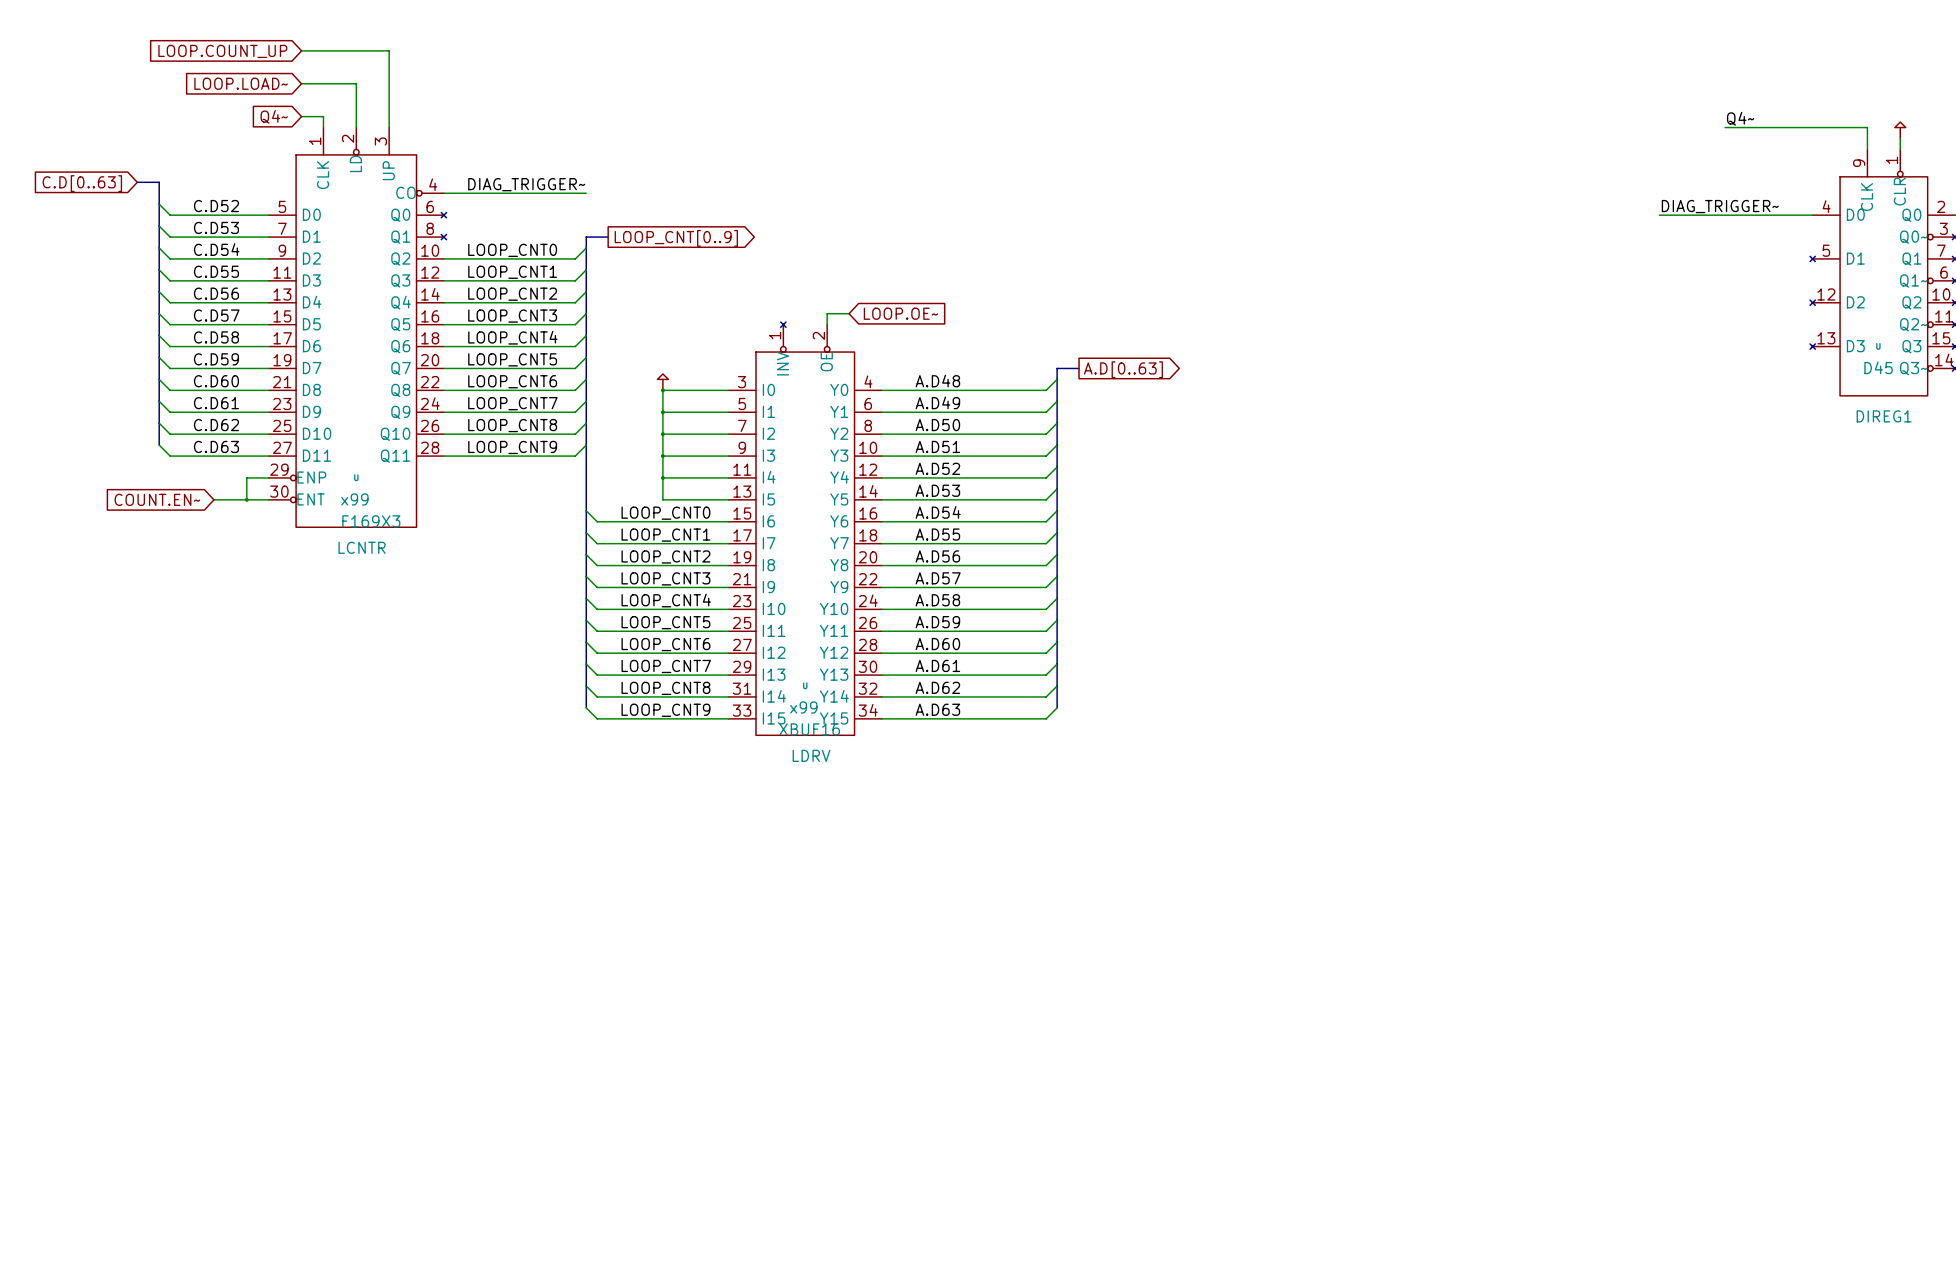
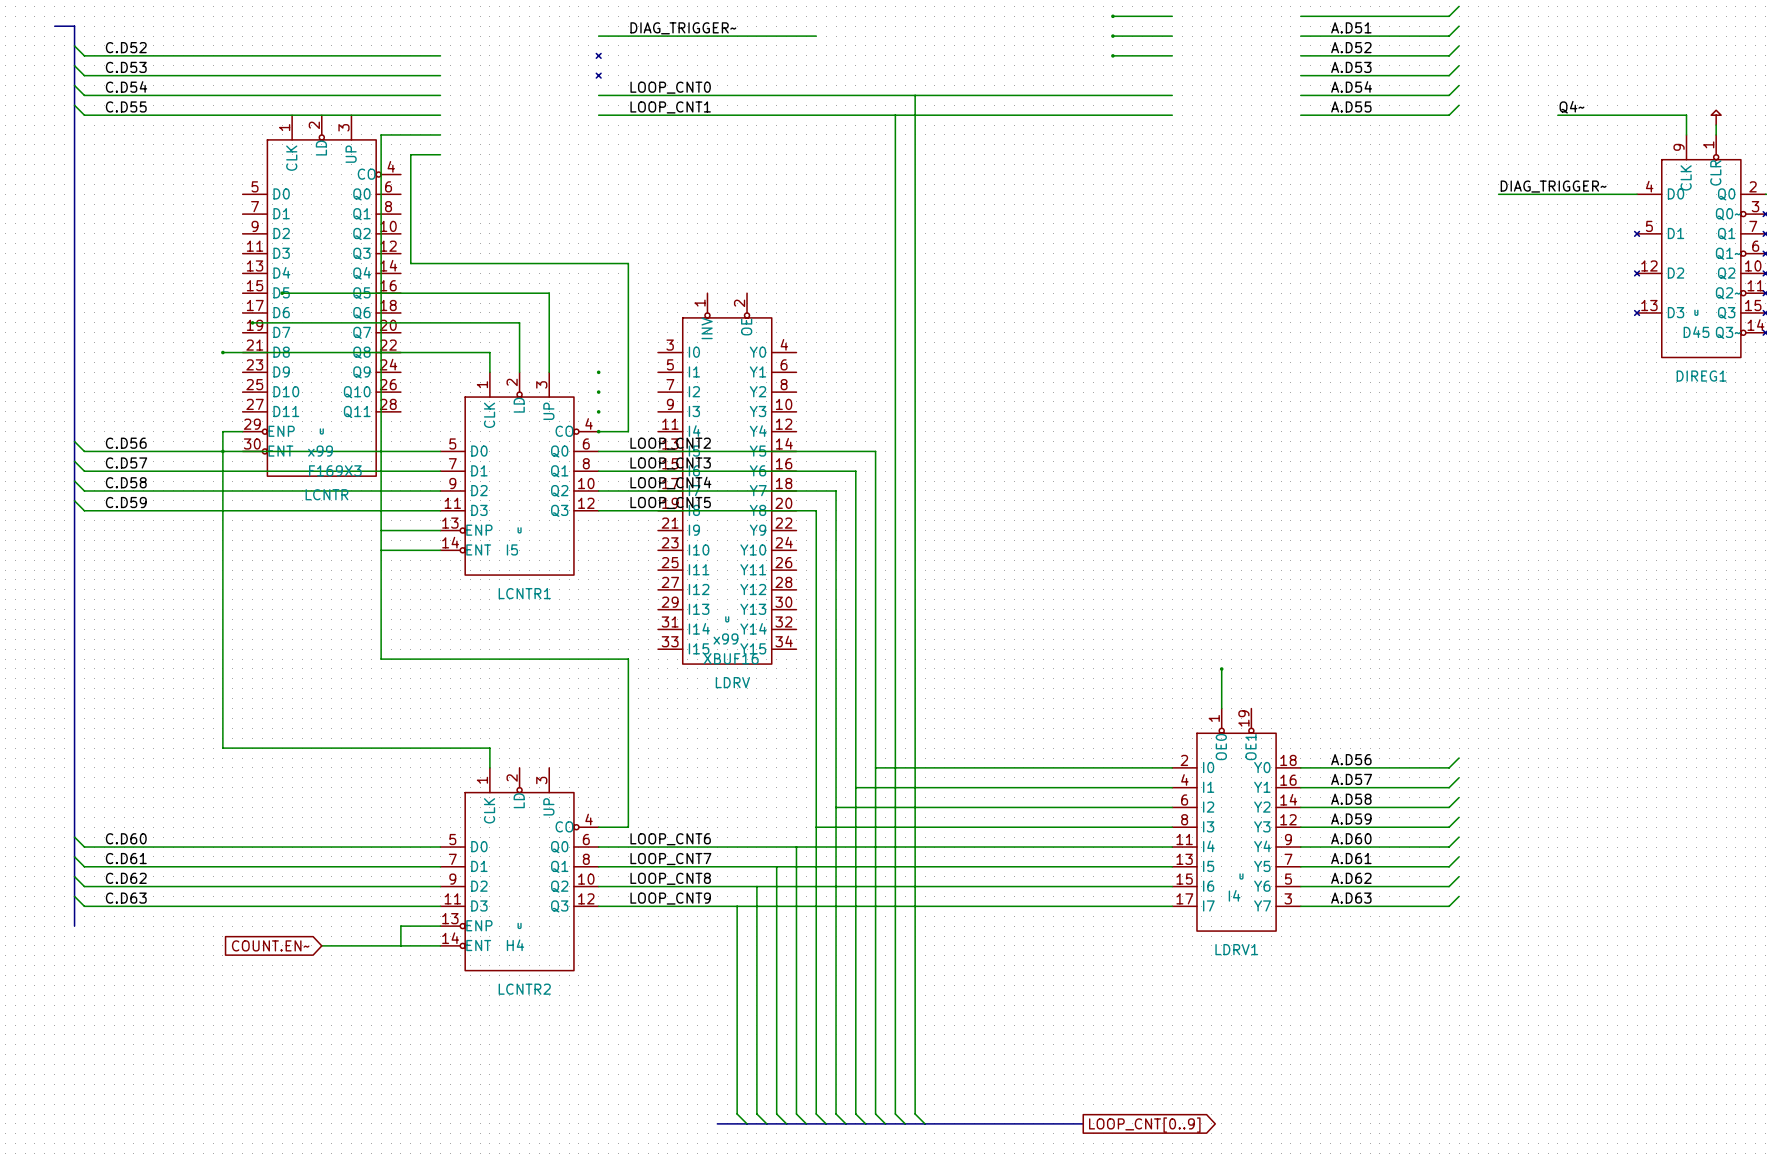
wire: none -> (1459, 6) (1449, 16) (1300, 16)
wire: none -> (1112, 16) (1172, 16)
junction: none -> (1112, 16)
bus: none -> (54, 26) (74, 26) (74, 926)
wire: none -> (1459, 26) (1449, 36) (1300, 36)
label: none -> A.D51 (1351, 27)
label: none -> DIAG_TRIGGER~ (683, 28)
wire: none -> (598, 36) (816, 36)
wire: none -> (1112, 36) (1172, 36)
junction: none -> (1112, 36)
wire: none -> (74, 45) (84, 55) (440, 55)
wire: (301, 50) (389, 50) (389, 127) -> none
wire: none -> (1459, 45) (1449, 55) (1300, 55)
global label: LOOP.COUNT_UP (222, 51) -> none
label: none -> C.D52 (126, 47)
label: none -> A.D52 (1351, 47)
no-connect mark: none -> (598, 55)
wire: none -> (1112, 55) (1172, 55)
junction: none -> (1112, 55)
wire: none -> (74, 65) (84, 75) (272, 75)
wire: none -> (1459, 65) (1449, 75) (1300, 75)
label: none -> C.D53 (126, 67)
label: none -> A.D53 (1351, 67)
global label: LOOP.LOAD~ (241, 83) -> none
wire: (356, 83) (356, 127) -> (321, 75) (440, 75)
no-connect mark: none -> (598, 75)
wire: none -> (74, 85) (84, 95) (440, 95)
wire: none -> (1459, 85) (1449, 95) (1300, 95)
label: none -> C.D54 (126, 86)
label: none -> A.D54 (1351, 86)
label: none -> LOOP_CNT0 (670, 87)
wire: none -> (598, 95) (1172, 95)
wire: none -> (915, 95) (915, 1114) (925, 1123)
wire: none -> (74, 105) (84, 115) (440, 115)
global label: Q4~ (274, 116) -> none
wire: (301, 116) (323, 116) (323, 127) -> none
wire: none -> (1459, 105) (1449, 115) (1300, 115)
label: none -> C.D55 (126, 106)
label: none -> LOOP_CNT1 (670, 107)
label: none -> A.D55 (1351, 106)
wire: none -> (598, 115) (1172, 115)
wire: none -> (895, 115) (895, 1114) (905, 1123)
wire: none -> (440, 134) (381, 134) (381, 659) (628, 659) (628, 827) (598, 827)
bus: (137, 182) (159, 182) (159, 445) -> none
global label: C.D[0..63] (82, 183) -> none
label: DIAG_TRIGGER~ (526, 184) -> none
wire: (443, 193) (586, 193) -> none
wire: (159, 204) (170, 215) (268, 215) -> none
label: C.D52 (216, 206) -> none
no-connect mark: (443, 215) -> none
wire: (159, 226) (170, 237) (268, 237) -> none
label: C.D53 (216, 227) -> none
no-connect mark: (443, 237) -> none
bus: (608, 237) (586, 237) (586, 707) -> none
global label: LOOP_CNT[0..9] (676, 238) -> none
wire: (159, 248) (170, 258) (268, 258) -> none
wire: (586, 248) (575, 258) (443, 258) -> none
label: C.D54 (216, 249) -> none
label: LOOP_CNT0 (512, 250) -> none
wire: (159, 269) (170, 280) (268, 280) -> none
wire: (586, 269) (575, 280) (443, 280) -> none
label: C.D55 (216, 271) -> none
label: LOOP_CNT1 (512, 272) -> none
wire: (159, 291) (170, 302) (268, 302) -> none
wire: (586, 291) (575, 302) (443, 302) -> none
label: C.D56 (216, 293) -> none
label: LOOP_CNT2 (512, 294) -> none
wire: (159, 313) (170, 324) (268, 324) -> none
wire: (586, 313) (575, 324) -> (549, 372) (549, 293) (519, 293)
wire: (849, 313) (827, 313) (827, 324) -> none
global label: LOOP.OE~ (900, 313) -> none
label: C.D57 (216, 315) -> none
label: LOOP_CNT3 (512, 316) -> none
wire: none -> (282, 293) (400, 293)
junction: none -> (282, 293)
no-connect mark: (783, 324) -> none
wire: (159, 335) (170, 346) (268, 346) -> none
wire: (586, 335) (575, 346) (443, 346) -> none
label: C.D58 (216, 337) -> none
label: LOOP_CNT4 (512, 337) -> none
wire: (159, 357) (170, 368) (268, 368) -> none
wire: none -> (252, 322) (519, 322) (519, 372)
junction: none -> (252, 322)
wire: (586, 357) (575, 368) (443, 368) -> none
label: C.D59 (216, 359) -> none
label: LOOP_CNT5 (512, 359) -> none
bus: (1079, 368) (1057, 368) (1057, 707) -> none
global label: A.D[0..63] (1123, 369) -> none
wire: (159, 379) (170, 390) (246, 390) -> none
wire: (586, 379) (575, 390) (542, 390) -> (489, 372) (489, 352)
wire: (1057, 379) (1046, 390) (881, 390) -> none
label: A.D48 (937, 380) -> none
label: C.D60 (216, 381) -> none
label: LOOP_CNT6 (512, 381) -> none
power symbol: (662, 381) -> none
junction: none -> (222, 352)
wire: none -> (242, 352) (400, 352)
junction: (662, 390) -> none
wire: (728, 390) (662, 390) (662, 499) -> none
wire: (159, 401) (170, 412) (268, 412) -> none
wire: (586, 401) (575, 412) (443, 412) -> none
wire: (1057, 401) (1046, 412) (881, 412) -> none
label: A.D49 (937, 402) -> none
label: C.D61 (216, 403) -> none
label: LOOP_CNT7 (512, 403) -> none
wire: (662, 412) (728, 412) -> none
wire: (159, 423) (170, 434) (268, 434) -> none
wire: (586, 423) (575, 434) (443, 434) -> none
wire: (1057, 423) (1046, 434) (881, 434) -> none
label: C.D62 (216, 425) -> none
label: LOOP_CNT8 (512, 425) -> none
label: A.D50 (937, 425) -> none
wire: (662, 434) (728, 434) -> none
wire: (159, 445) (170, 456) (268, 456) -> none
wire: (586, 445) (575, 456) (443, 456) -> none
wire: (1057, 445) (1046, 456) (881, 456) -> none
label: C.D63 (216, 446) -> none
label: A.D51 (937, 446) -> none
label: LOOP_CNT9 (512, 447) -> none
wire: (662, 456) (728, 456) -> none
wire: (1057, 467) (1046, 477) (881, 477) -> none
label: A.D52 (937, 468) -> none
wire: (695, 477) (728, 477) -> (628, 431) (628, 263) (410, 263) (410, 154) (440, 154)
wire: none -> (74, 441) (84, 451) (193, 451)
wire: (1057, 488) (1046, 499) (969, 499) -> (885, 1123) (875, 1114) (875, 451)
label: none -> C.D56 (126, 443)
label: A.D53 (937, 490) -> none
global label: COUNT.EN~ (157, 499) -> none
wire: none -> (222, 451) (222, 748) (489, 748) (489, 767)
wire: none -> (242, 451) (440, 451)
wire: none -> (658, 451) (796, 451)
wire: none -> (74, 461) (84, 471) (440, 471)
wire: (586, 510) (597, 521) (662, 521) -> none
wire: (1057, 510) (1046, 521) (947, 521) -> (865, 1123) (855, 1114) (855, 471)
label: none -> C.D57 (126, 462)
label: A.D54 (938, 512) -> none
label: LOOP_CNT0 (665, 513) -> none
wire: none -> (658, 471) (796, 471)
part: none -> (519, 473)
wire: none -> (74, 481) (84, 490) (440, 490)
wire: (586, 532) (597, 543) (662, 543) -> none
wire: (1057, 532) (1046, 543) (925, 543) -> (845, 1123) (836, 1114) (836, 490)
label: none -> C.D58 (126, 482)
label: A.D55 (937, 534) -> none
label: LOOP_CNT1 (665, 535) -> none
wire: none -> (658, 490) (796, 490)
wire: none -> (74, 500) (84, 510) (440, 510)
wire: (586, 554) (597, 565) (662, 565) -> none
wire: (1057, 554) (1046, 565) (903, 565) -> (826, 1123) (816, 1114) (816, 510)
label: none -> C.D59 (126, 502)
label position: LOOP_CNT2 (665, 556) -> LOOP_CNT2 (670, 443)
label: A.D56 (937, 556) -> none
wire: none -> (658, 510) (796, 510)
wire: (586, 576) (597, 587) (728, 587) -> none
wire: (1057, 576) (1046, 587) (881, 587) -> none
label position: LOOP_CNT3 (665, 578) -> LOOP_CNT3 (670, 463)
label: A.D57 (938, 578) -> none
wire: none -> (381, 530) (440, 530)
wire: (586, 598) (597, 609) (728, 609) -> none
wire: (1057, 598) (1046, 609) (881, 609) -> none
label position: LOOP_CNT4 (666, 600) -> LOOP_CNT4 (670, 482)
label: A.D58 (937, 600) -> none
wire: none -> (381, 550) (440, 550)
wire: (586, 620) (597, 631) (728, 631) -> none
wire: (1057, 620) (1046, 631) (881, 631) -> none
label position: LOOP_CNT5 (665, 622) -> LOOP_CNT5 (670, 503)
label: A.D59 (937, 622) -> none
wire: (586, 642) (597, 653) (728, 653) -> none
wire: (1057, 642) (1046, 653) (881, 653) -> none
label: LOOP_CNT6 (665, 644) -> none
label: A.D60 (937, 644) -> none
wire: (586, 664) (597, 675) (728, 675) -> none
wire: (1057, 664) (1046, 675) (881, 675) -> none
label: A.D61 (937, 665) -> none
label: LOOP_CNT7 (666, 666) -> none
wire: (586, 686) (597, 696) (728, 696) -> none
wire: (1057, 686) (1046, 696) (881, 696) -> none
label: A.D62 (937, 687) -> none
label: LOOP_CNT8 (665, 688) -> none
wire: (586, 707) (597, 718) (728, 718) -> none
wire: (1057, 707) (1046, 718) (881, 718) -> none
label: A.D63 (937, 709) -> none
label: LOOP_CNT9 (665, 710) -> none
wire: none -> (1221, 668) (1221, 708)
junction: none -> (1221, 668)
wire: none -> (1459, 758) (1449, 767) (1300, 767)
label: none -> A.D56 (1351, 759)
wire: none -> (875, 767) (1172, 767)
wire: none -> (1459, 777) (1449, 787) (1300, 787)
label: none -> A.D57 (1351, 779)
wire: none -> (855, 787) (1172, 787)
wire: none -> (1459, 797) (1449, 807) (1300, 807)
label: none -> A.D58 (1351, 799)
wire: none -> (836, 807) (1172, 807)
wire: none -> (1459, 817) (1449, 827) (1300, 827)
label: none -> A.D59 (1351, 818)
part: none -> (1236, 819)
wire: none -> (816, 827) (1172, 827)
wire: none -> (74, 837) (84, 847) (440, 847)
wire: none -> (1459, 837) (1449, 847) (1300, 847)
label: none -> C.D60 (126, 838)
label: none -> A.D60 (1351, 838)
label: none -> LOOP_CNT6 (670, 839)
wire: none -> (598, 847) (1172, 847)
wire: none -> (796, 847) (796, 1114) (806, 1123)
wire: none -> (74, 856) (84, 866) (440, 866)
wire: none -> (1459, 856) (1449, 866) (1300, 866)
label: none -> C.D61 (126, 858)
label: none -> A.D61 (1351, 858)
label: none -> LOOP_CNT7 (670, 859)
wire: none -> (598, 866) (1172, 866)
wire: none -> (776, 866) (776, 1114) (786, 1123)
part: none -> (519, 869)
wire: none -> (74, 876) (84, 886) (440, 886)
wire: none -> (1459, 876) (1449, 886) (1300, 886)
label: none -> C.D62 (126, 878)
label: none -> A.D62 (1351, 878)
label: none -> LOOP_CNT8 (670, 878)
wire: none -> (598, 886) (1172, 886)
wire: none -> (756, 886) (756, 1114) (766, 1123)
wire: none -> (74, 896) (84, 906) (440, 906)
wire: none -> (1459, 896) (1449, 906) (1300, 906)
label: none -> C.D63 (126, 898)
label: none -> LOOP_CNT9 (670, 898)
label: none -> A.D63 (1351, 898)
wire: none -> (598, 906) (1172, 906)
wire: none -> (737, 906) (737, 1114) (747, 1123)
wire: none -> (440, 926) (400, 926) (400, 945)
global label: none -> COUNT.EN~ (270, 945)
wire: none -> (321, 945) (440, 945)
bus: none -> (717, 1123) (1083, 1123)
global label: none -> LOOP_CNT[0..9] (1144, 1125)

